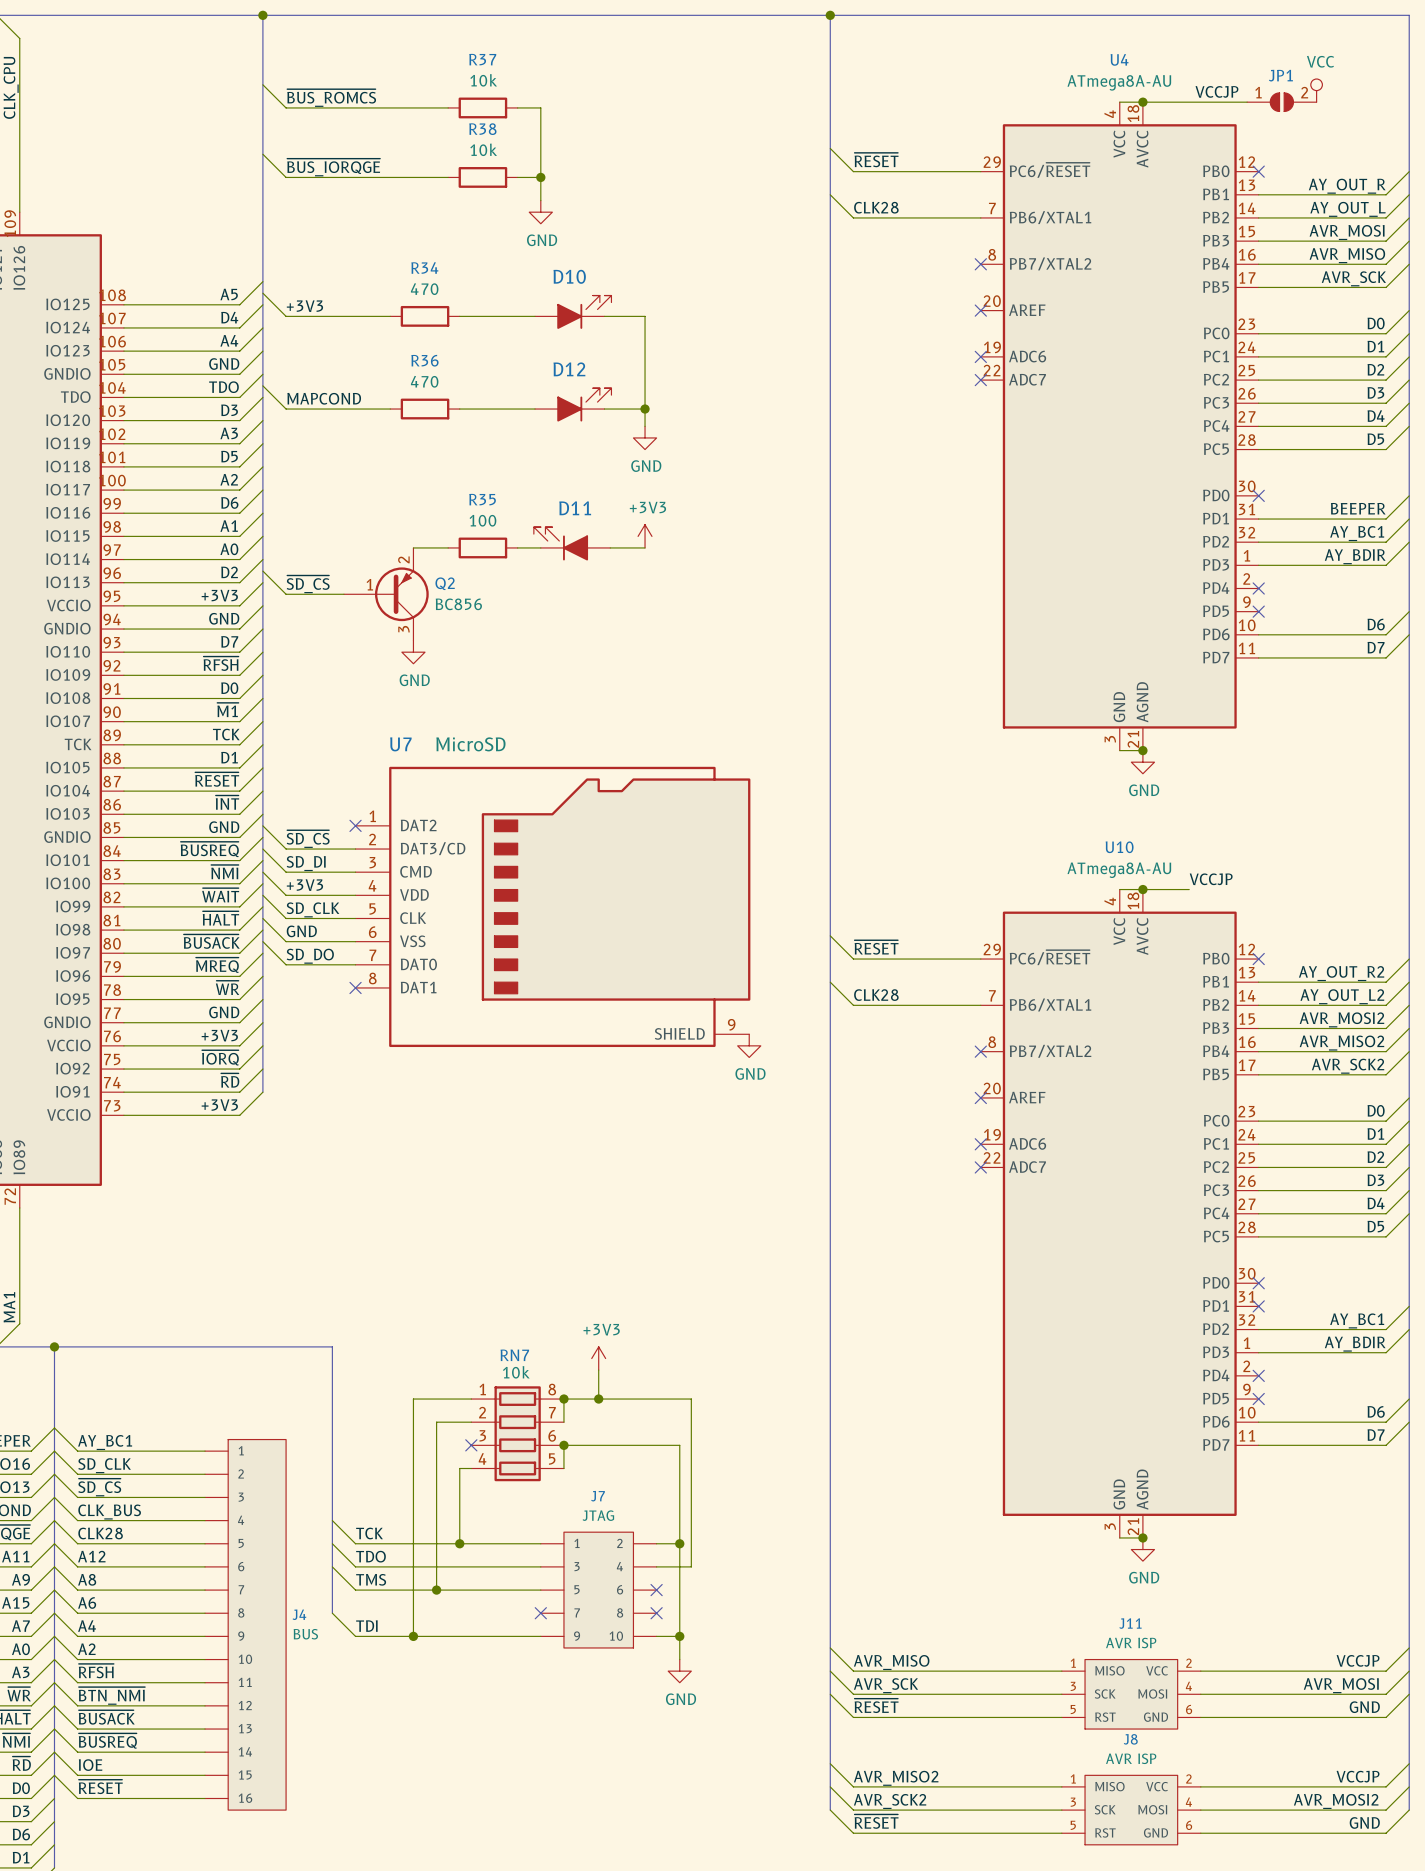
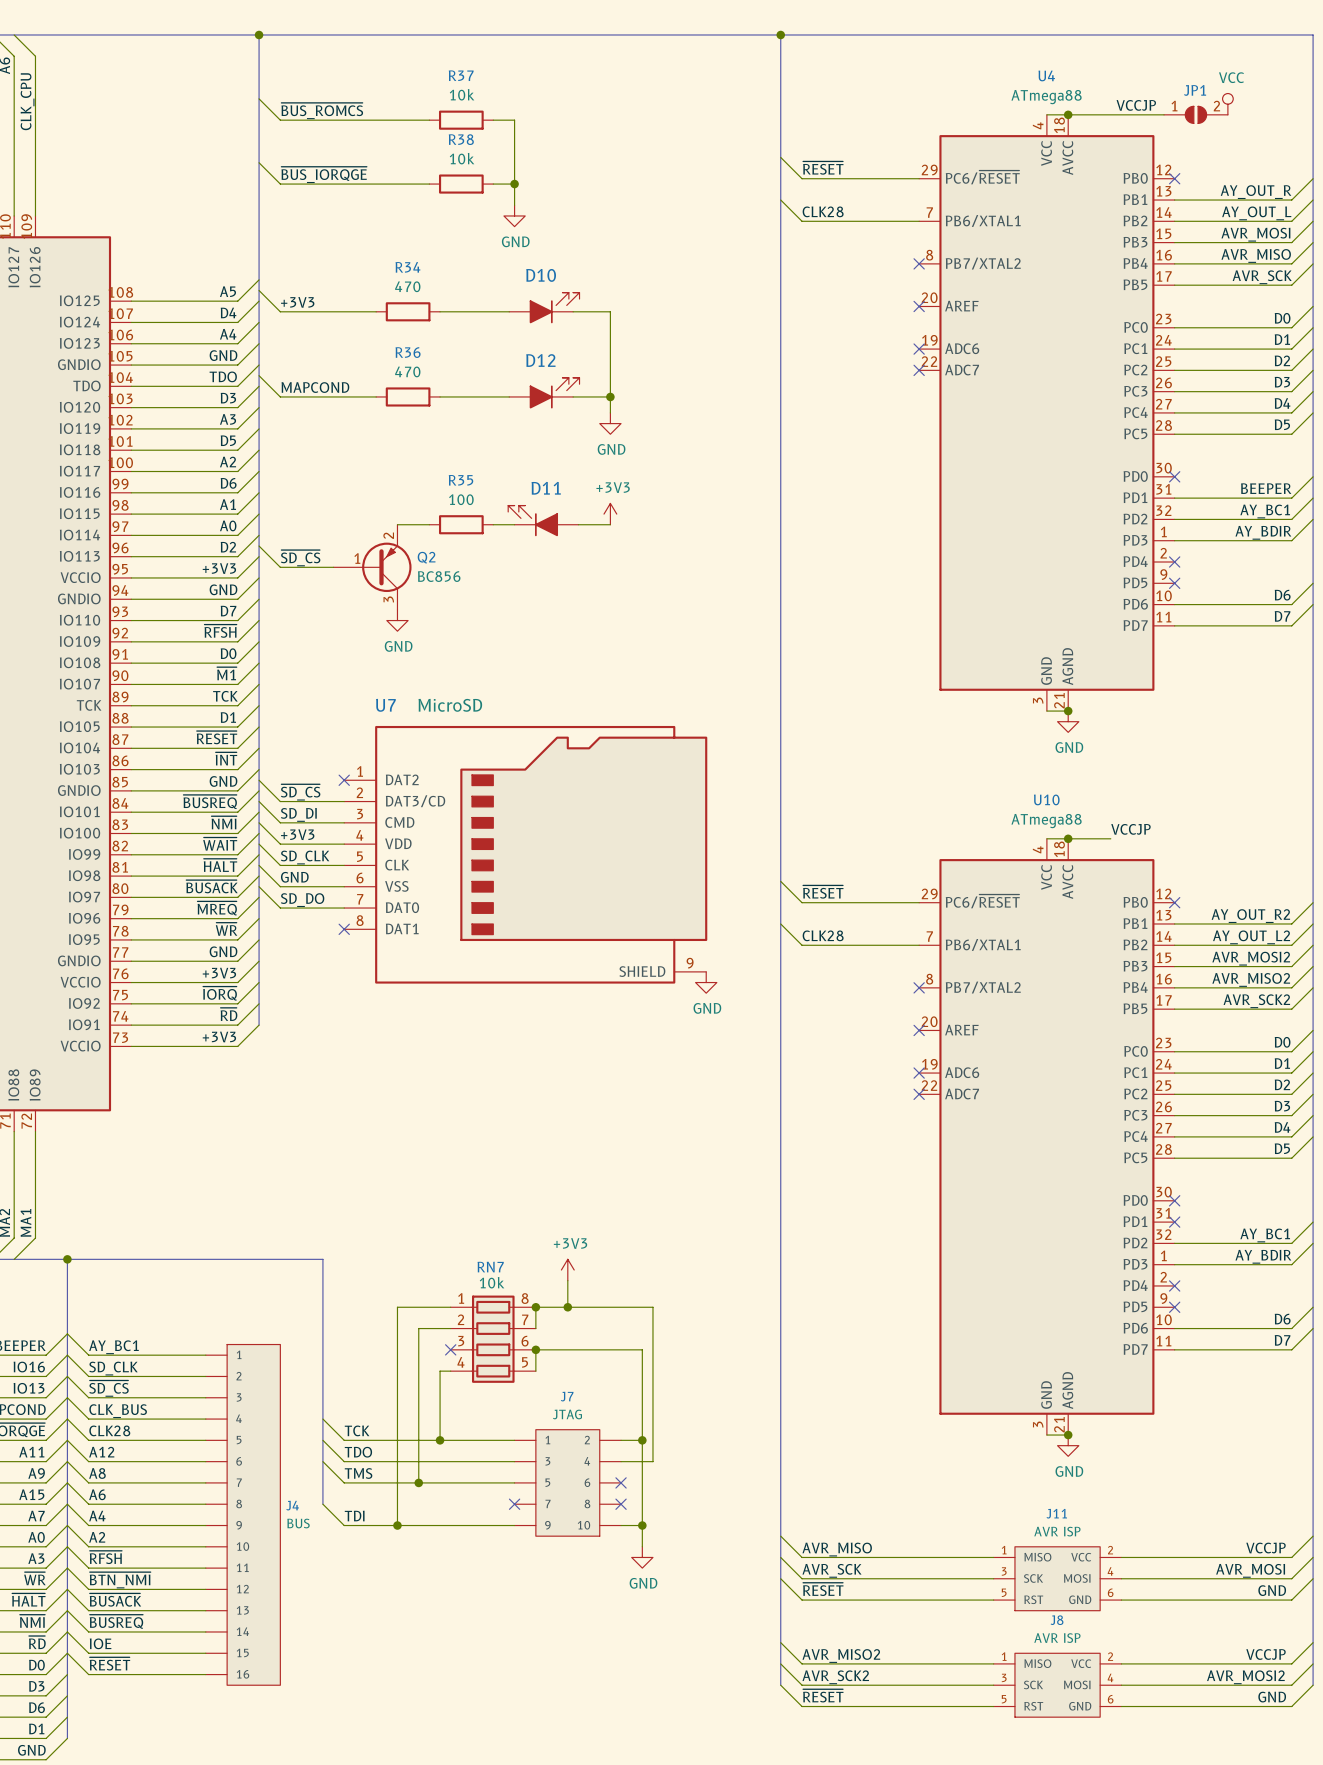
U4 value: ATmega8A-AU (1119, 82) -> ATmega88 (1046, 97)
U10 value: ATmega8A-AU (1119, 870) -> ATmega88 (1046, 821)

